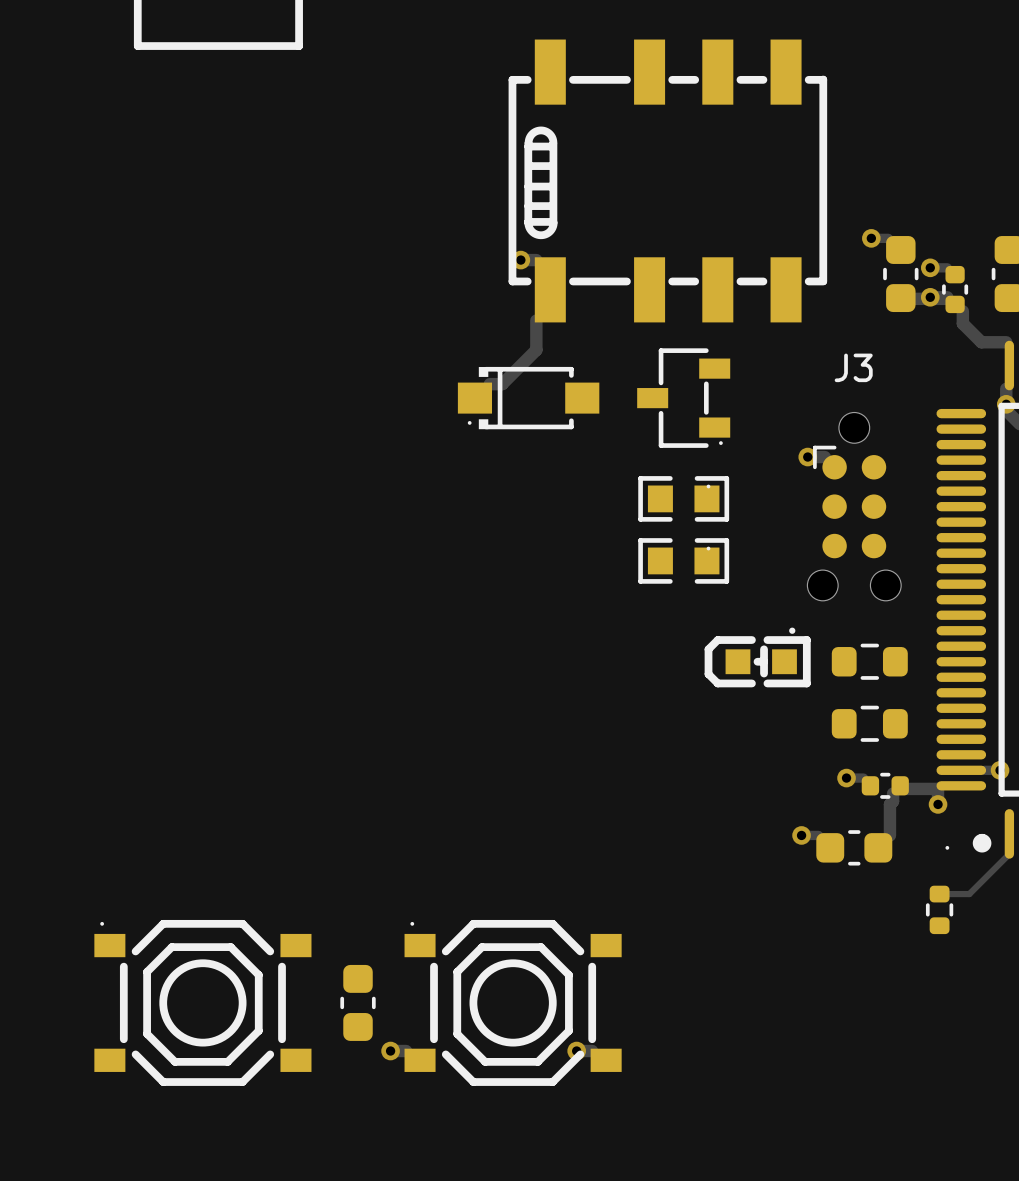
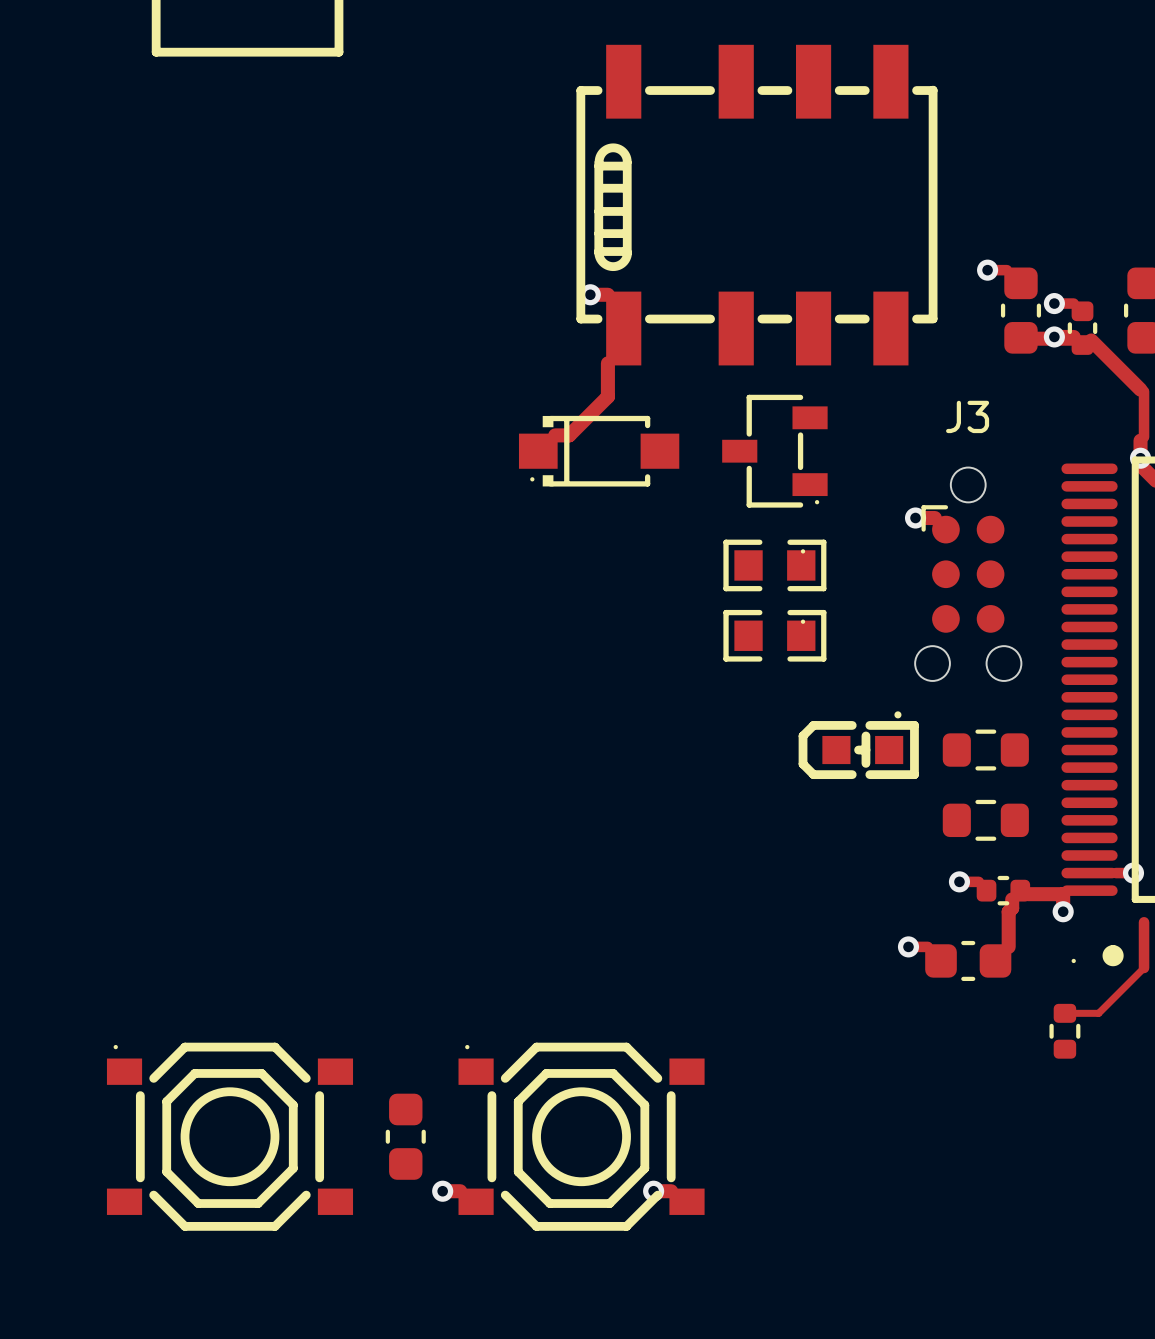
track: none -> (1091, 340) (1140, 389)
track: (962, 311) (962, 323) (981, 342) (1006, 342) -> none

